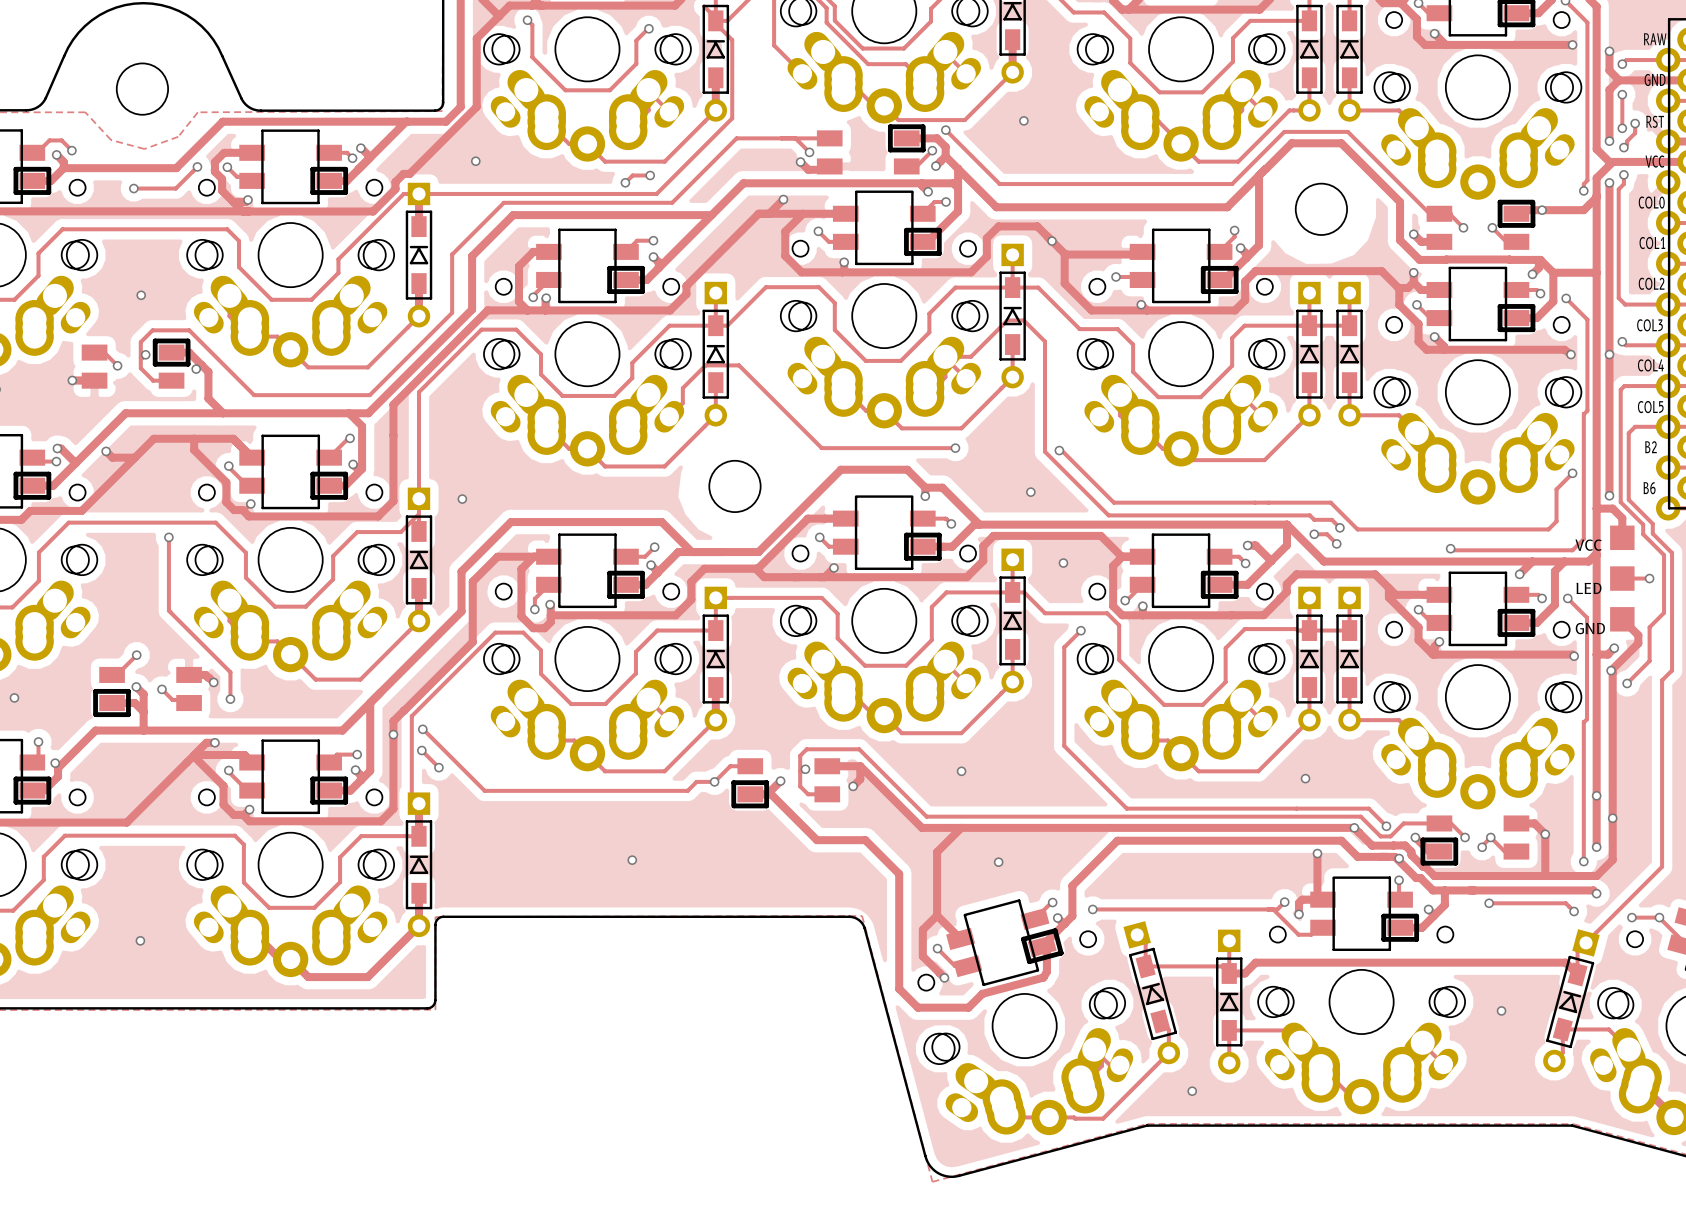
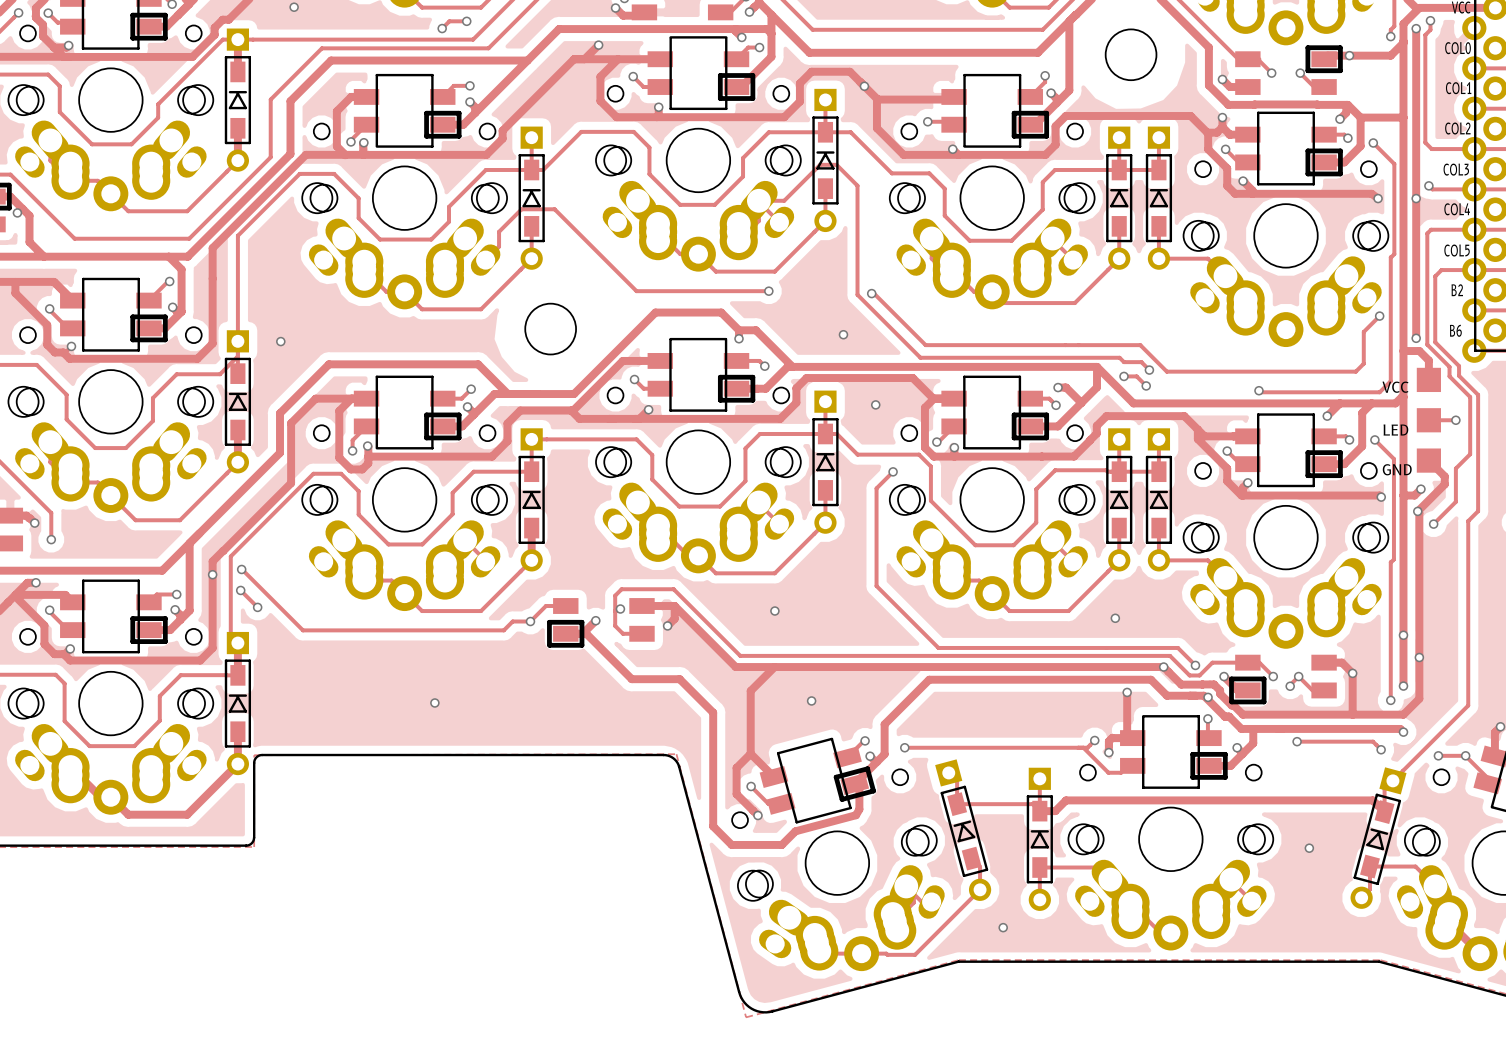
via position: (632, 860) -> (434, 702)

